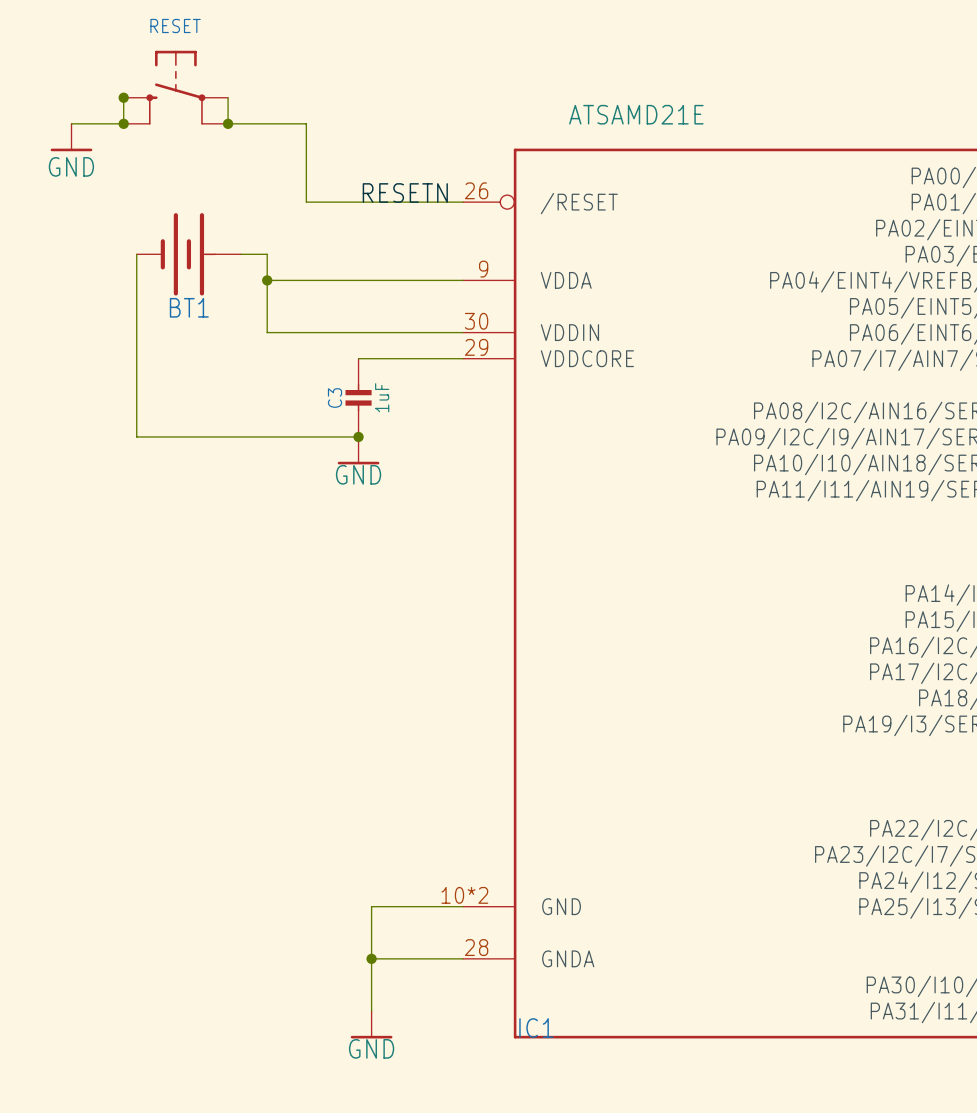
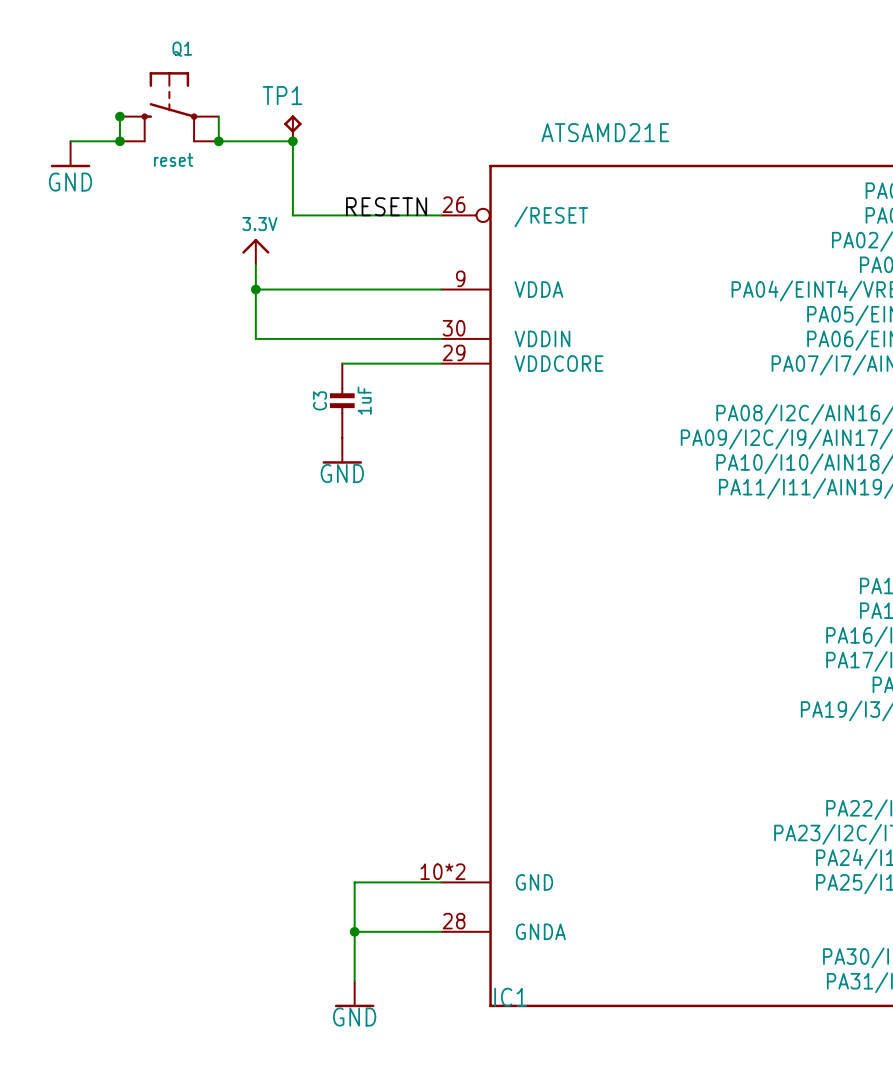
RESET name: RESET (175, 25) -> Q1 (182, 49)
TP1: none -> (292, 128)
junction: none -> (292, 141)
RESET value: none -> reset (173, 159)
power symbol: none -> 3.3V (255, 251)
wire: (136, 254) (136, 436) (358, 436) -> none
BT1: (188, 254) -> none
wire: (241, 254) (267, 254) -> none
junction: (358, 436) -> none

